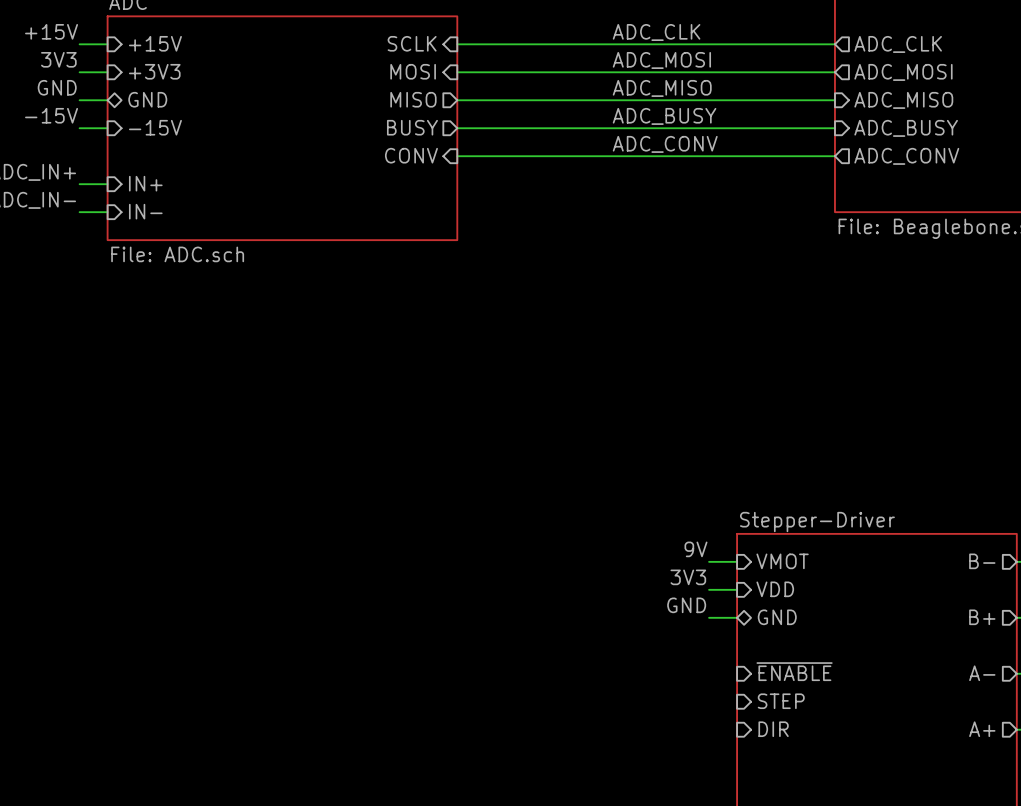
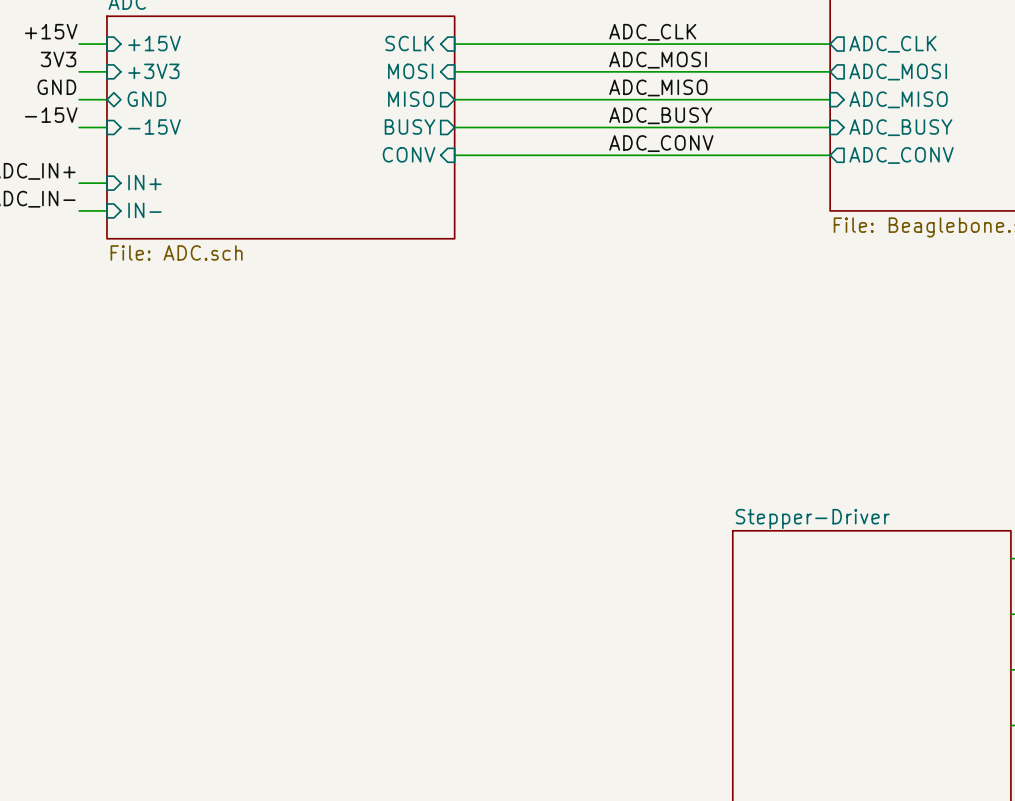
label: 9V (695, 549) -> none
wire: (709, 561) (737, 561) -> none
sheet pin: VMOT (782, 561) -> none
sheet pin: B- (982, 561) -> none
label: 3V3 (688, 577) -> none
wire: (709, 589) (737, 589) -> none
sheet pin: VDD (775, 589) -> none
label: GND (686, 605) -> none
wire: (709, 617) (737, 617) -> none
sheet pin: GND (777, 617) -> none
sheet pin: B+ (982, 617) -> none
sheet pin: ~{ENABLE} (794, 671) -> none
sheet pin: A- (982, 673) -> none
sheet pin: STEP (781, 701) -> none
sheet pin: DIR (773, 729) -> none
sheet pin: A+ (982, 729) -> none

